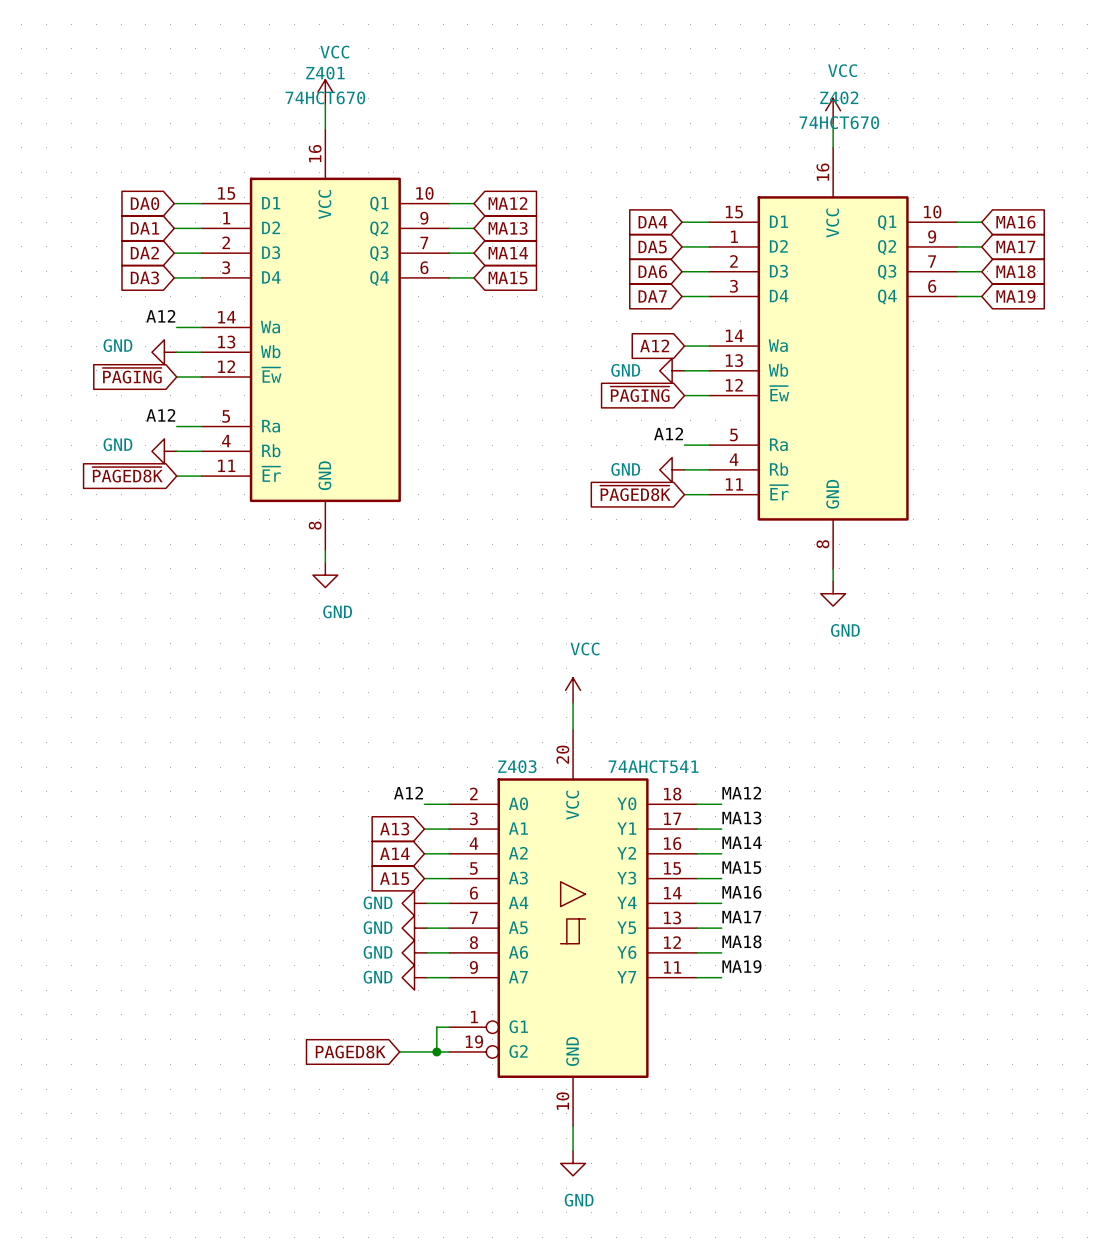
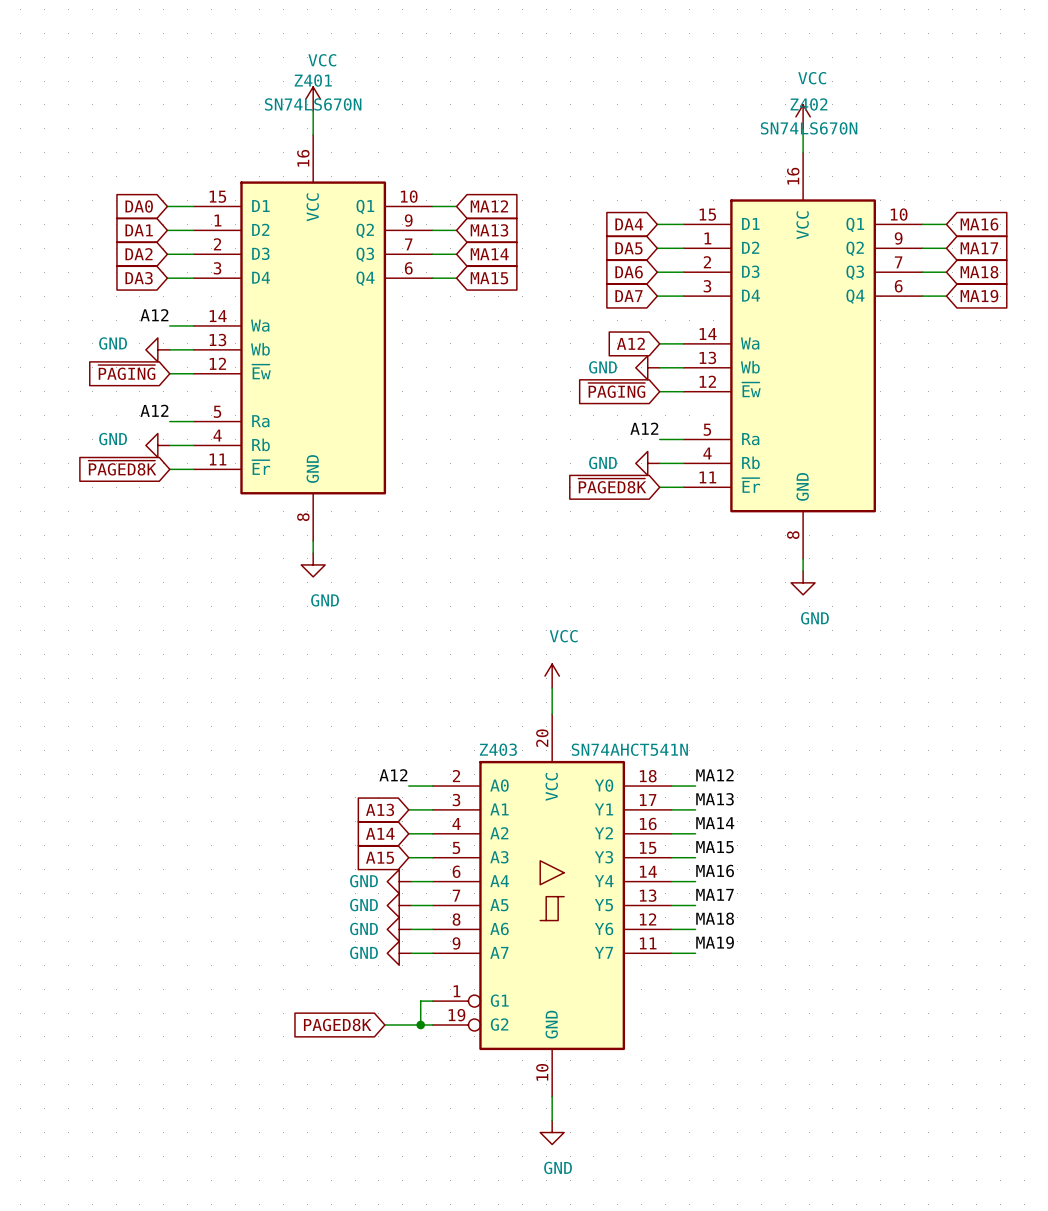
Z401 value: 74HCT670 (325, 97) -> SN74LS670N (313, 104)
Z402 value: 74HCT670 (839, 122) -> SN74LS670N (809, 128)
Z403 value: 74AHCT541 (653, 766) -> SN74AHCT541N (629, 749)

